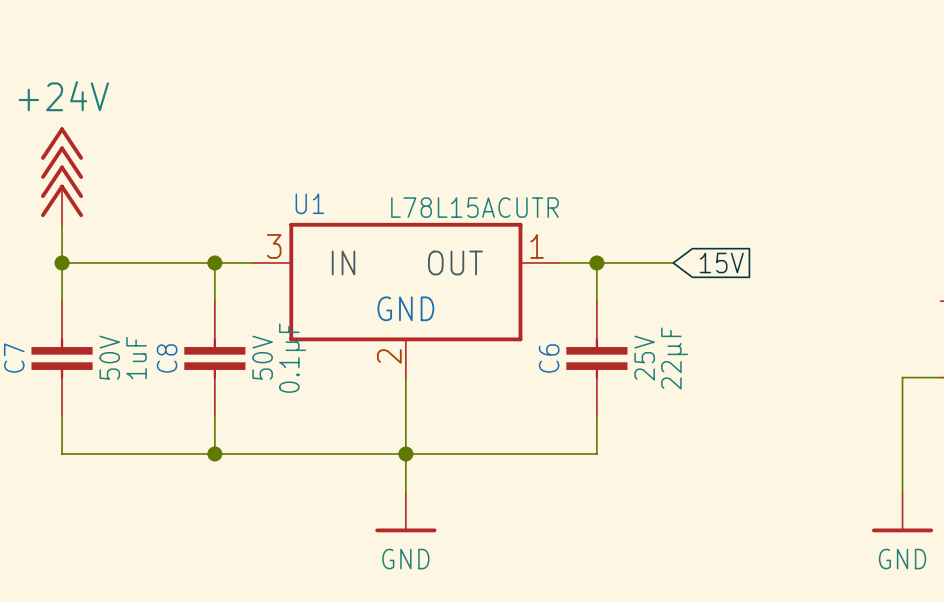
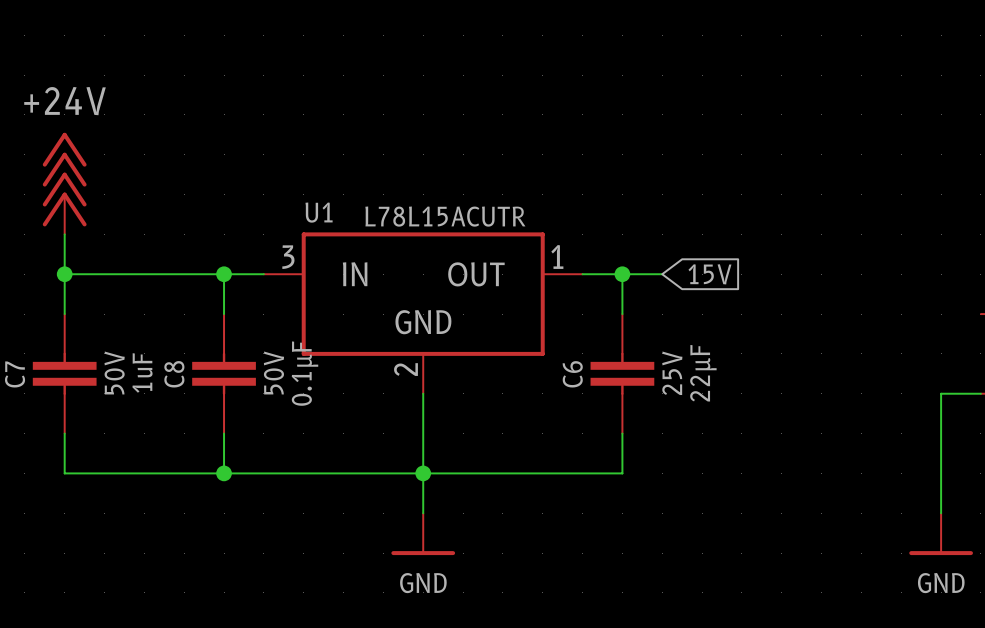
U1 text position: L78L15ACUTR (474, 207) -> L78L15ACUTR (445, 216)
wire: (635, 262) (673, 262) -> none
global label position: 15V (721, 262) -> 15V (709, 274)

